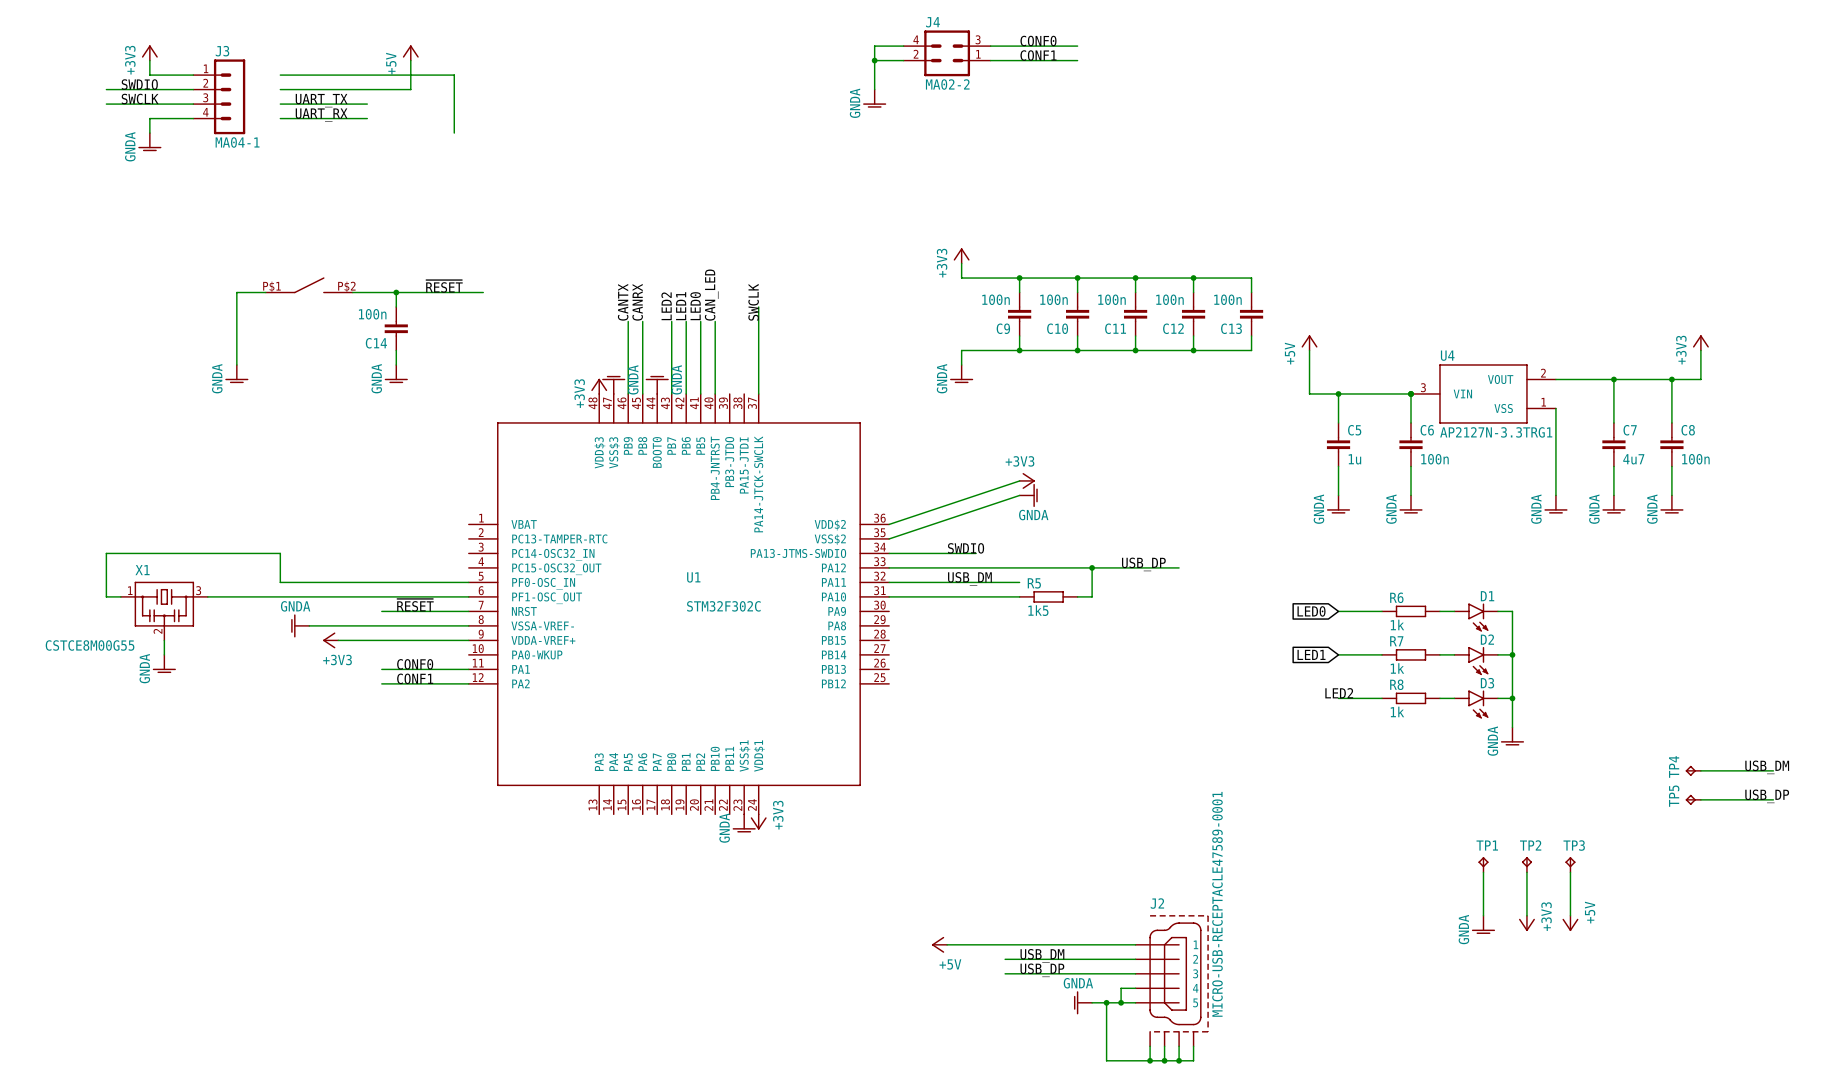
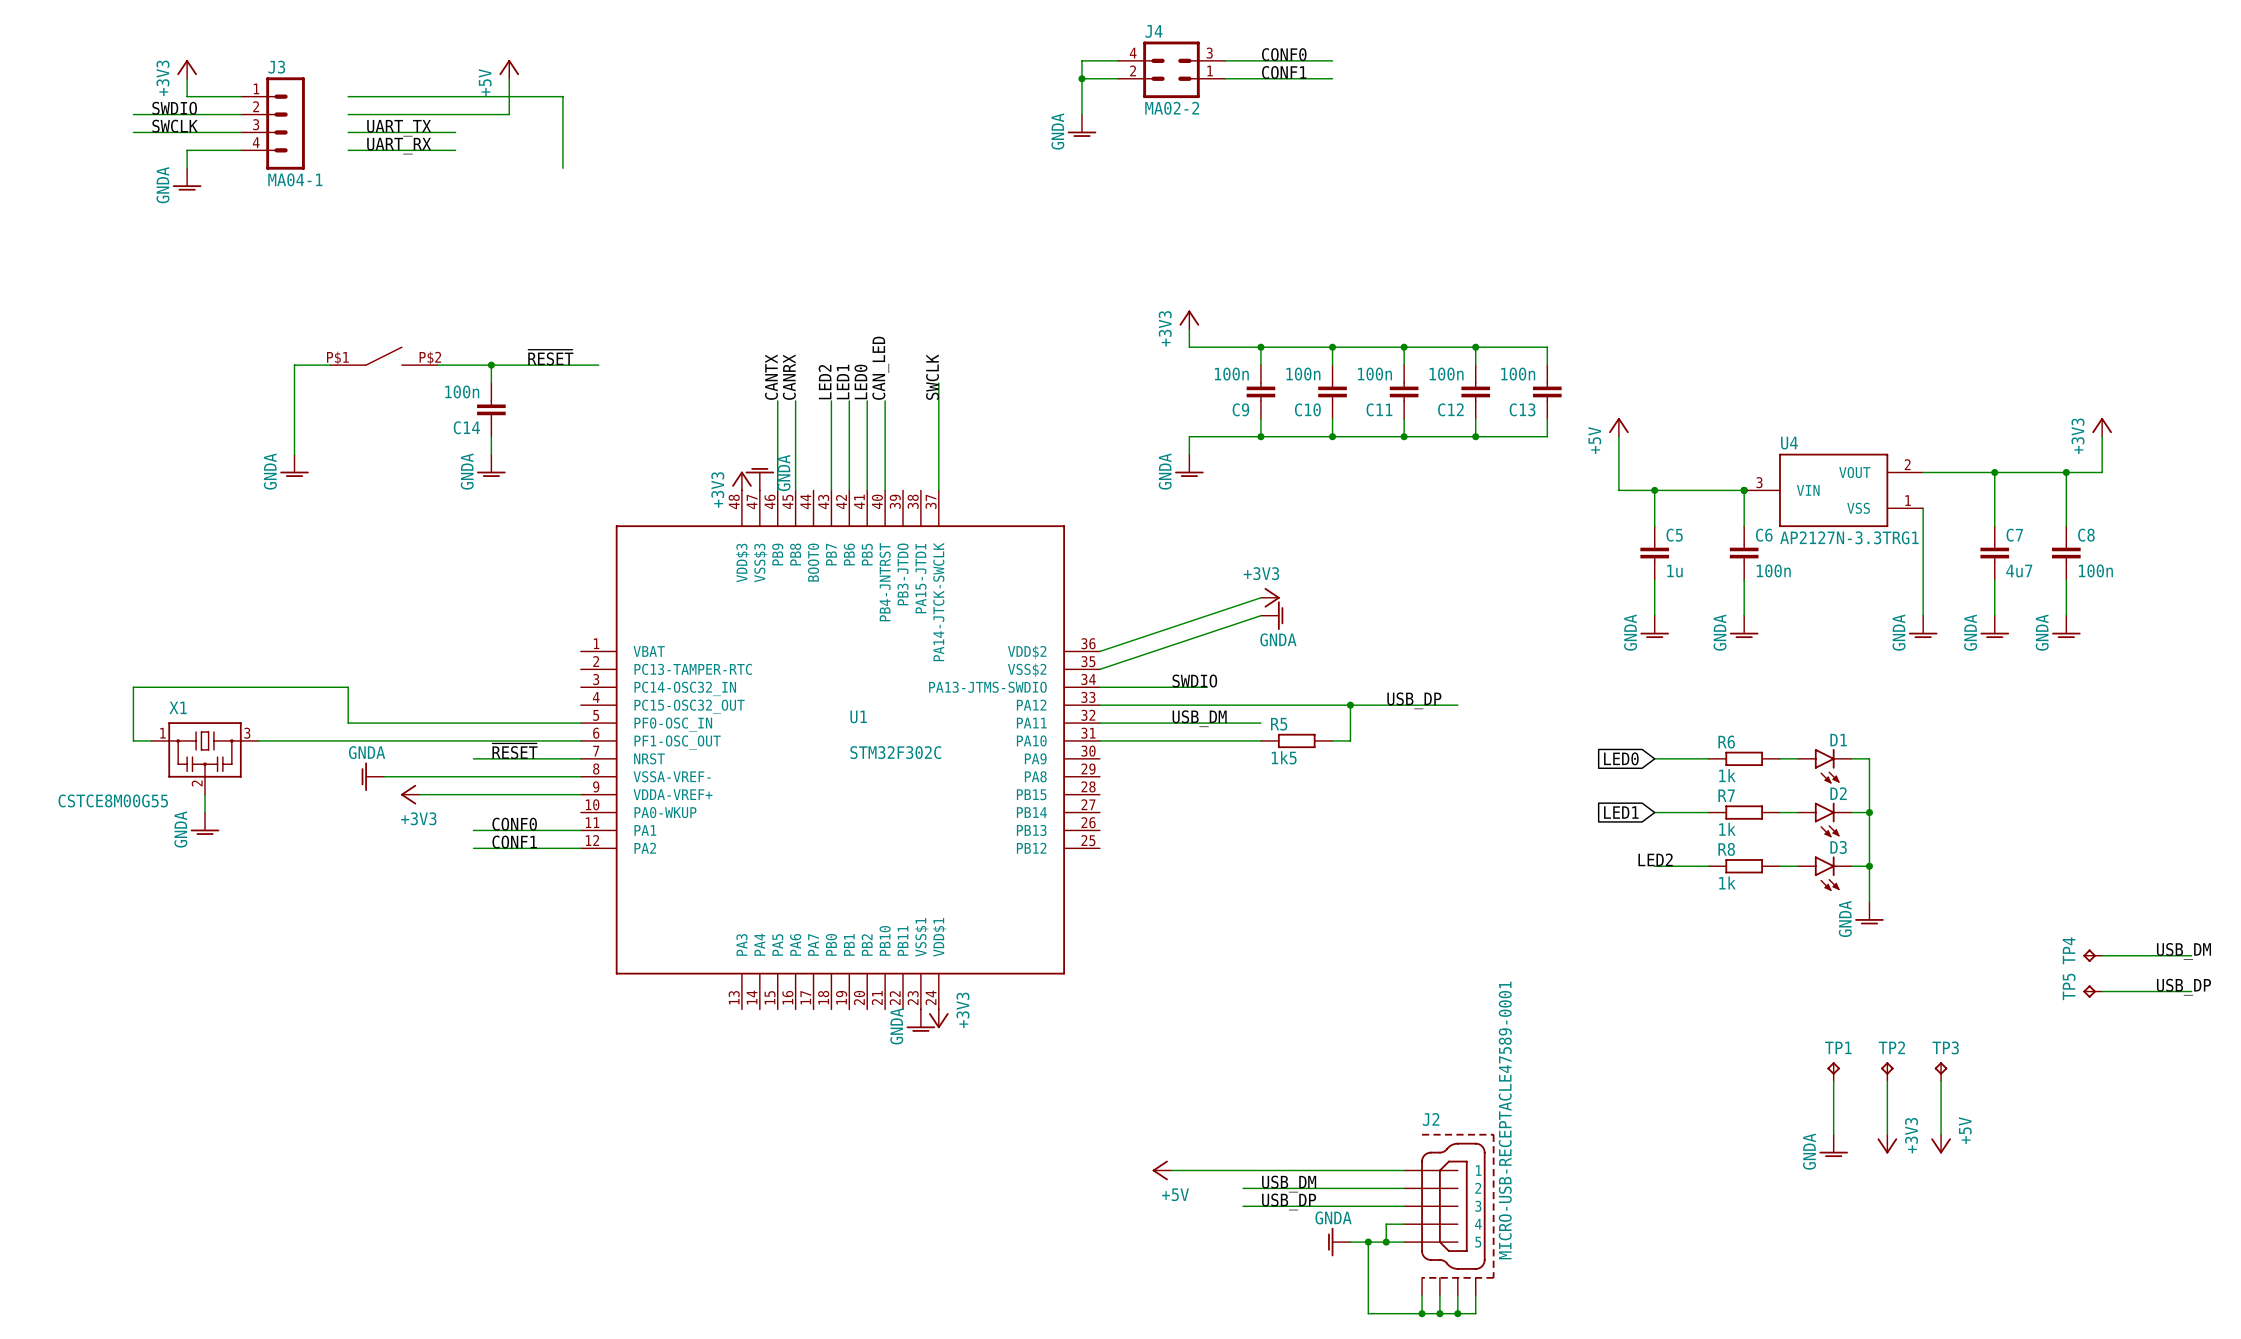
power symbol: GNDA (657, 384) -> none

